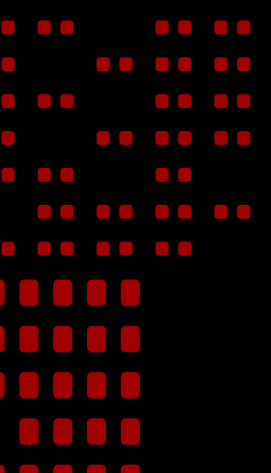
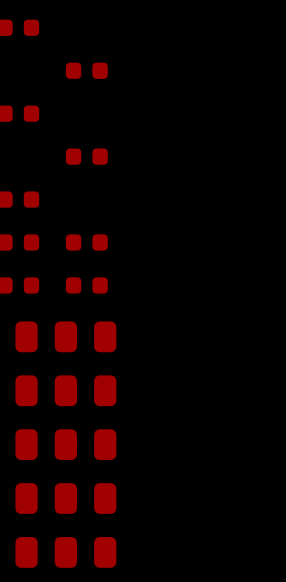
part: (173, 27) -> none
part: (232, 27) -> none
part: (173, 64) -> none
part: (232, 64) -> none
part: (173, 101) -> none
part: (232, 101) -> none
part: (173, 137) -> none
part: (232, 137) -> none
part: (173, 174) -> none
part: (173, 211) -> none
part: (232, 211) -> none
part: (173, 248) -> none

